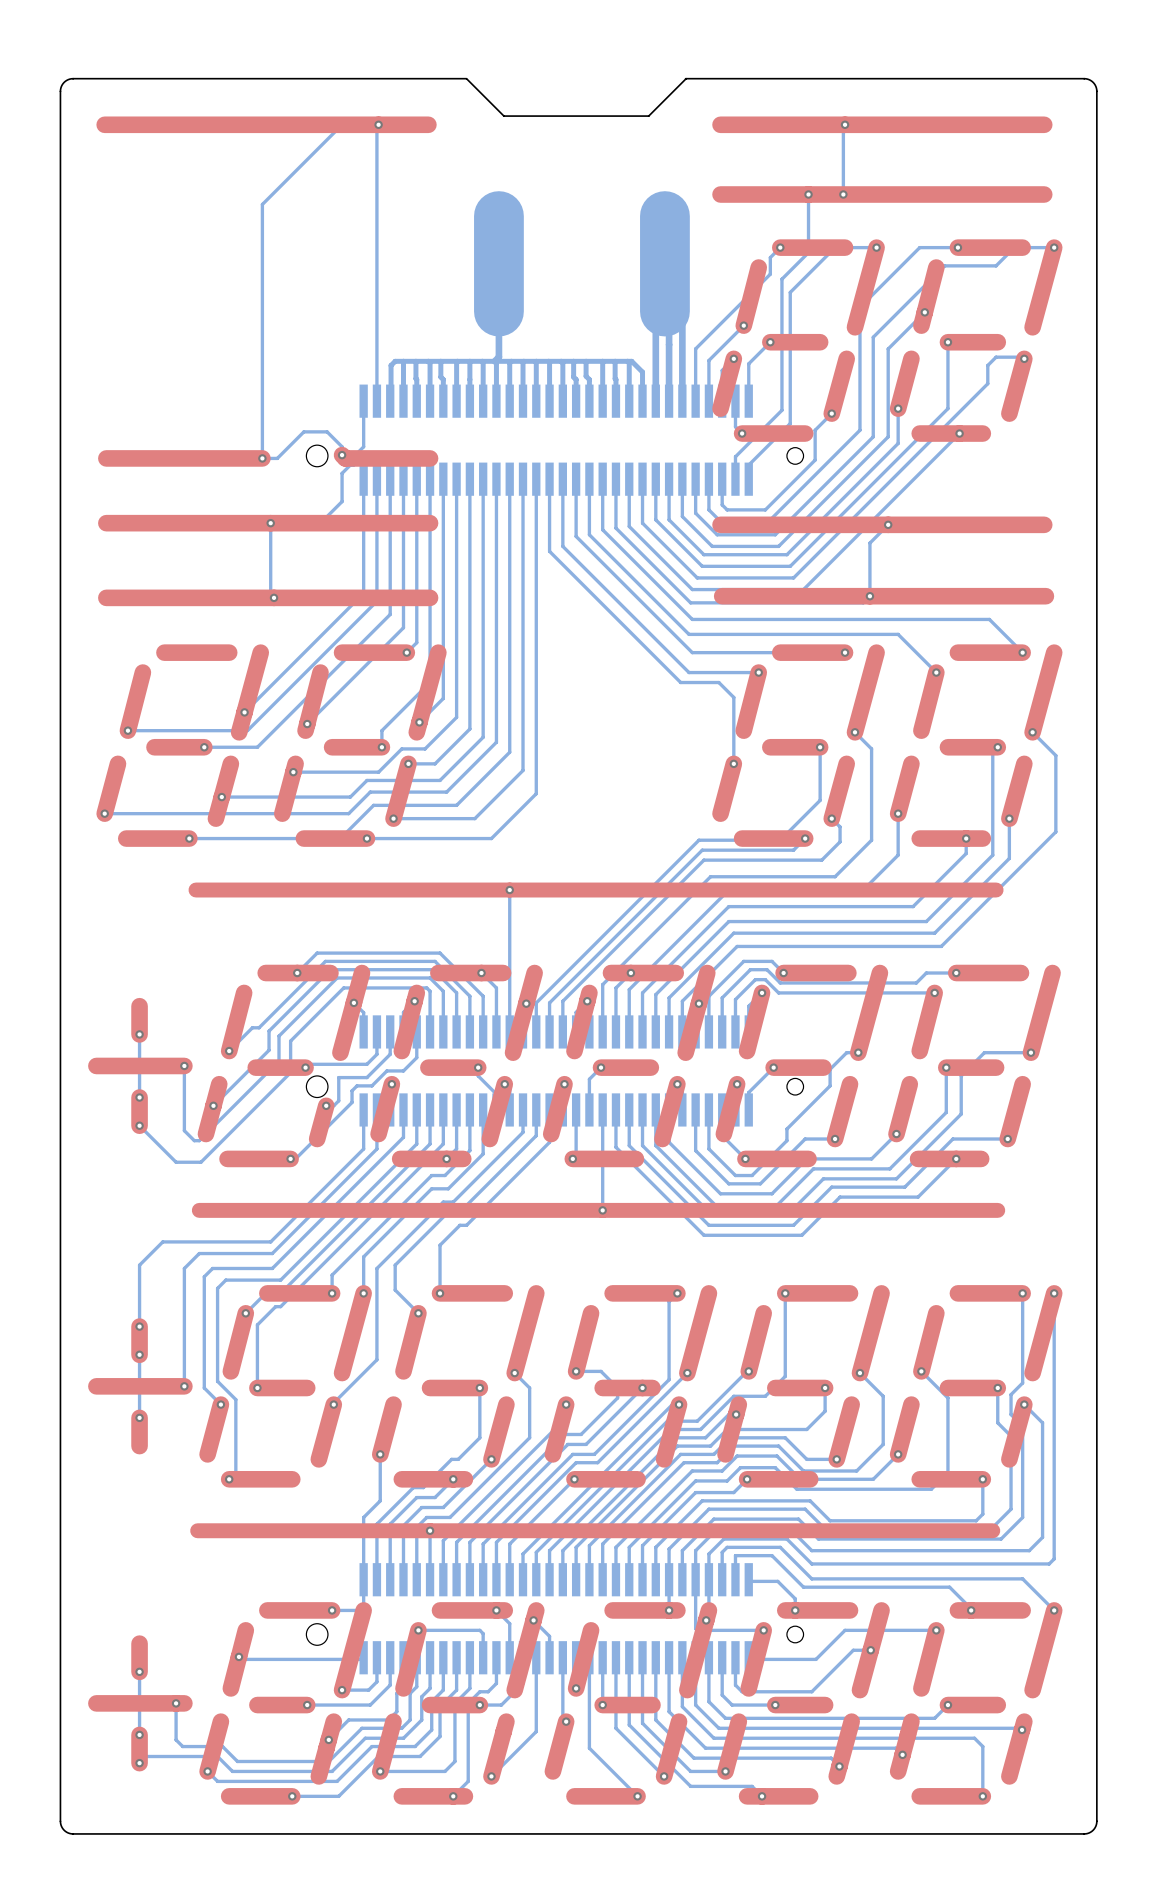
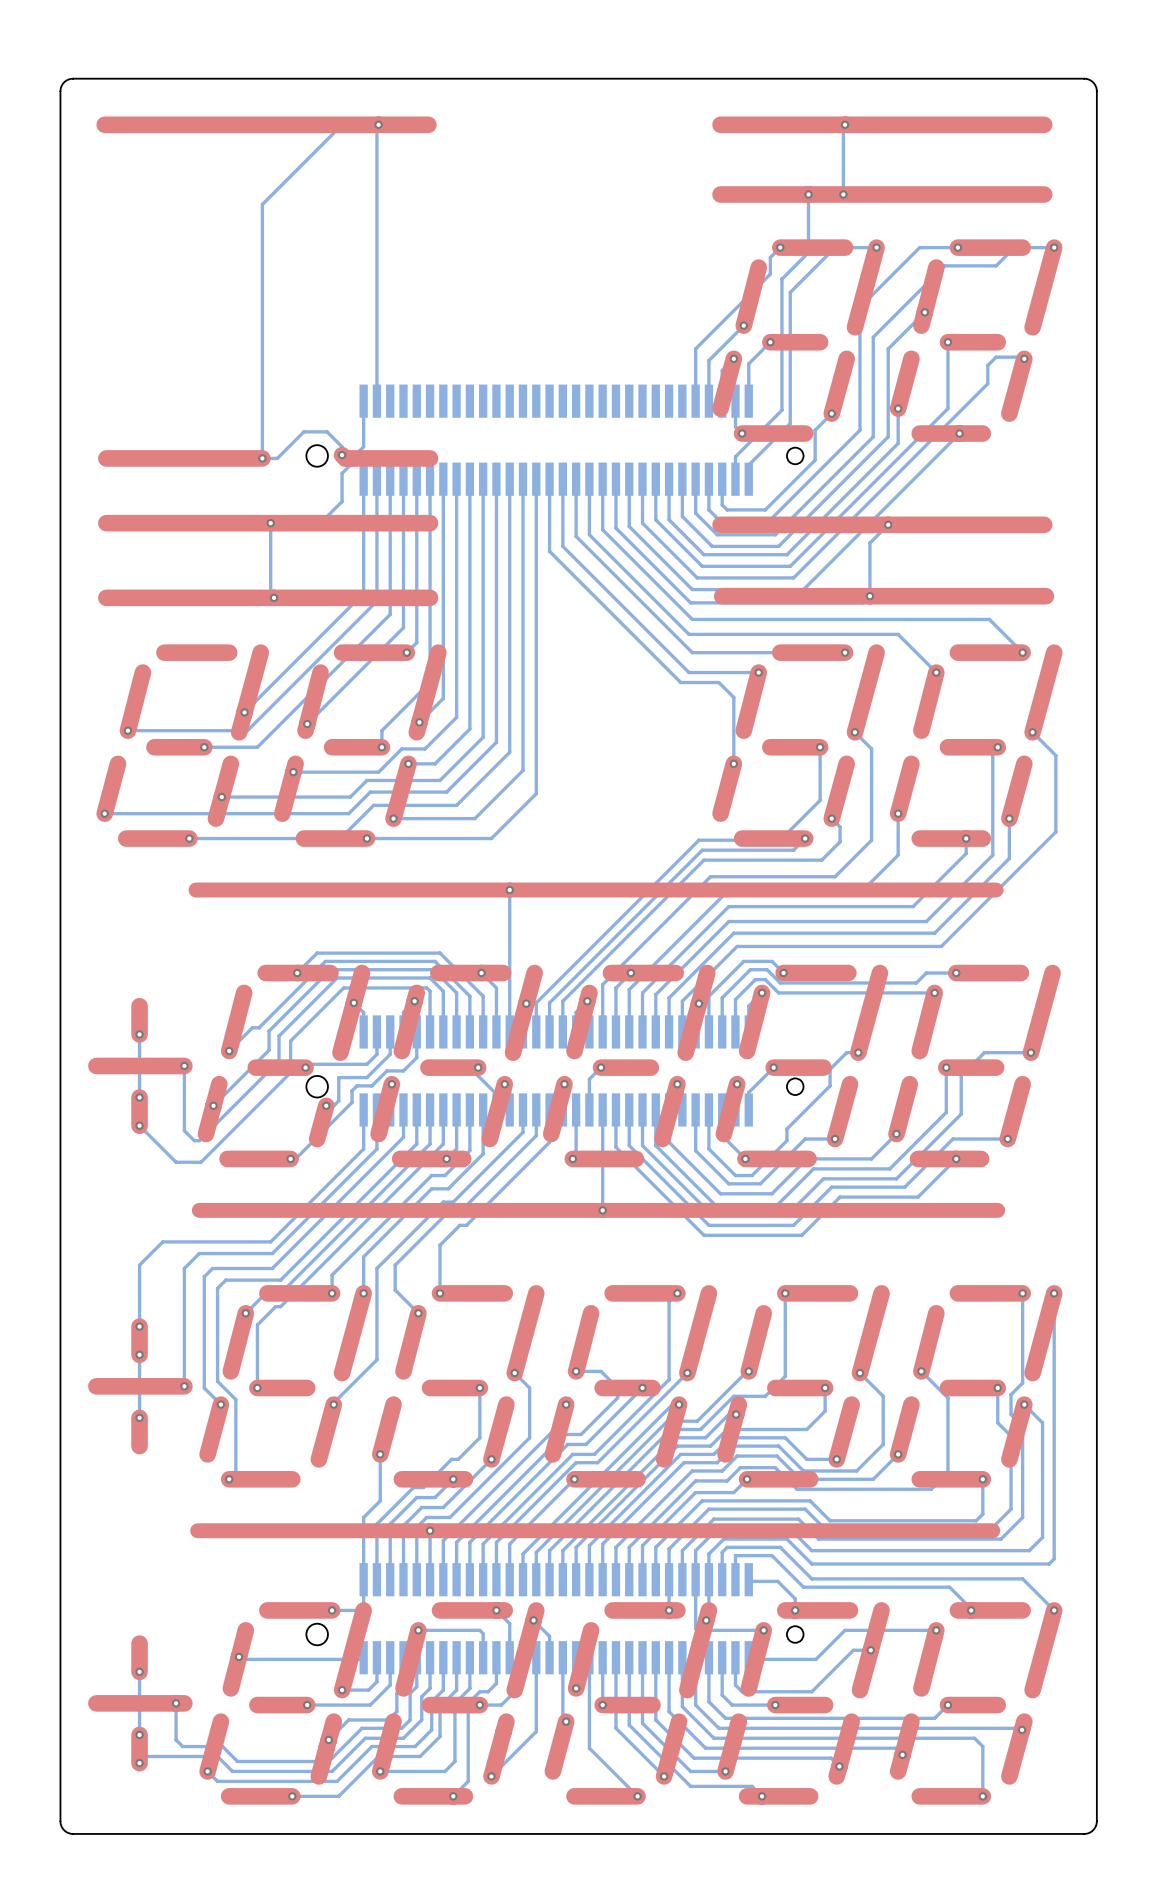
board edge: (466, 78) (503, 116) (648, 116) (686, 78) -> (466, 78) (685, 78)
bottom track: (498, 216) (498, 357) (494, 361) (496, 362) (496, 401) -> none
bottom track: (664, 216) (664, 311) -> none
bottom track: (669, 307) (669, 401) -> none
bottom track: (669, 307) (682, 320) (682, 401) -> none
bottom track: (669, 307) (655, 320) (655, 401) -> none
bottom track: (403, 361) (403, 401) -> none
bottom track: (415, 361) (416, 401) -> none
bottom track: (428, 361) (430, 362) (430, 401) -> none
bottom track: (440, 361) (443, 401) -> none
bottom track: (457, 361) (456, 401) -> none
bottom track: (469, 361) (469, 401) -> none
bottom track: (482, 361) (483, 401) -> none
bottom track: (511, 361) (509, 362) (509, 401) -> none
bottom track: (523, 361) (523, 401) -> none
bottom track: (536, 361) (536, 401) -> none
bottom track: (548, 361) (549, 401) -> none
bottom track: (561, 361) (562, 362) (562, 401) -> none
bottom track: (573, 361) (576, 401) -> none
bottom track: (586, 361) (586, 376) (589, 379) (589, 401) -> none
bottom track: (602, 361) (602, 401) -> none
bottom track: (615, 361) (615, 401) -> none
bottom track: (627, 361) (629, 362) (629, 401) -> none
bottom track: (390, 401) (391, 365) (395, 361) (631, 361) (642, 372) (642, 401) -> none

